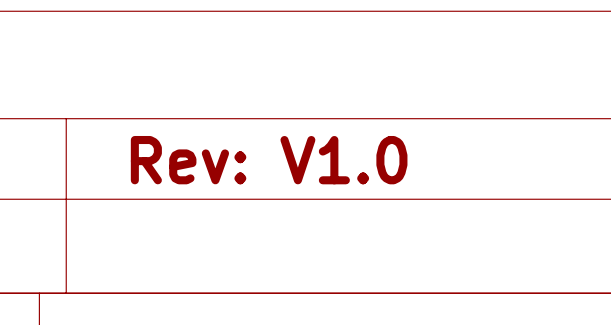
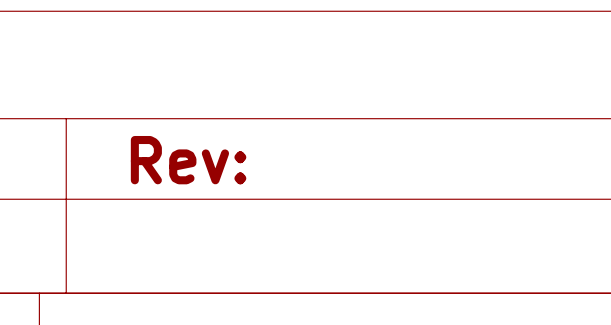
title block: Rev: V1.0 (269, 160) -> Rev: (188, 160)

